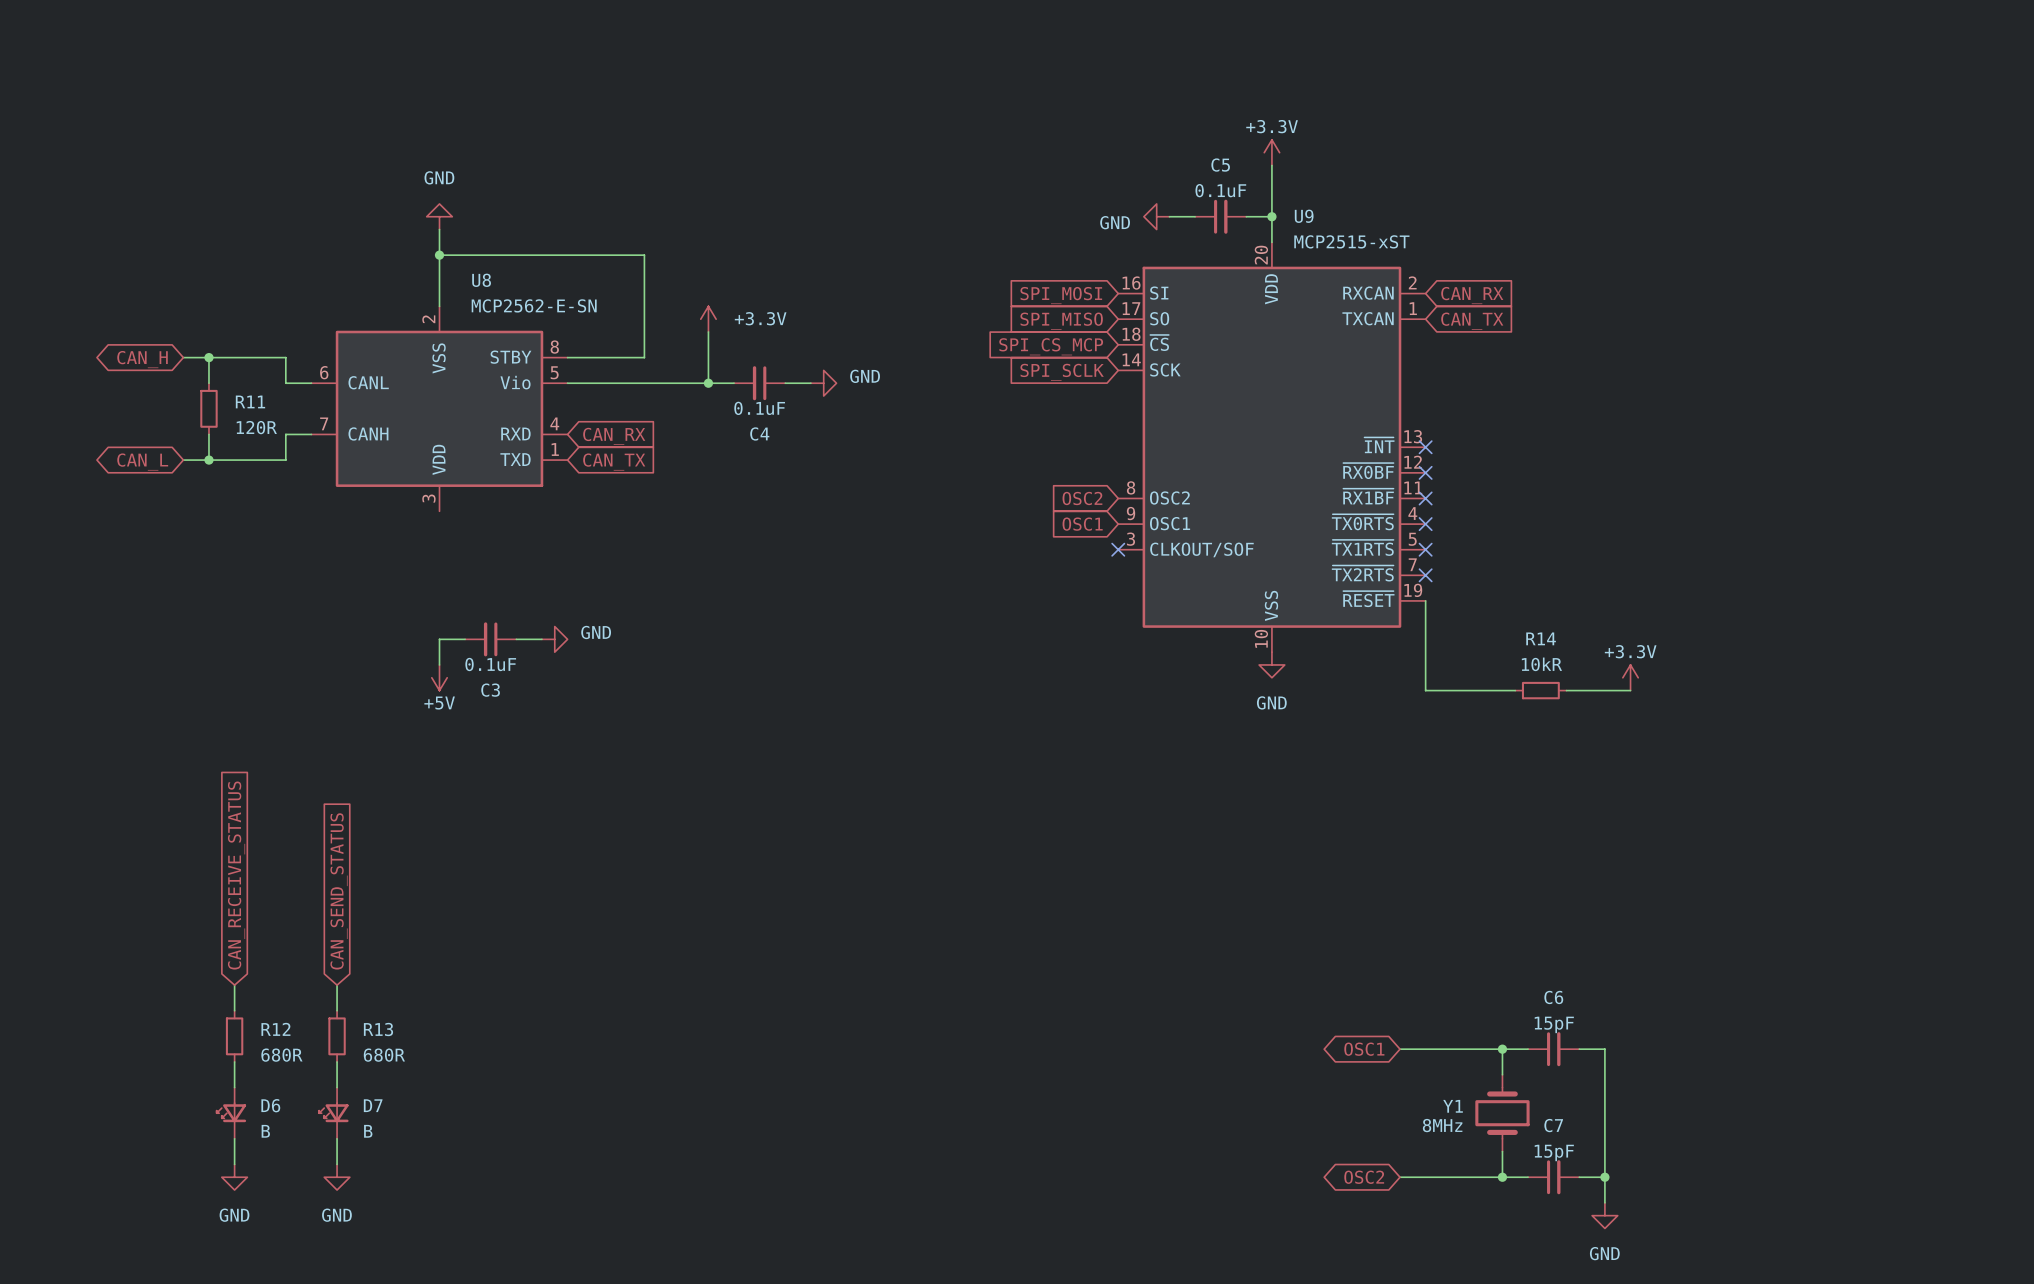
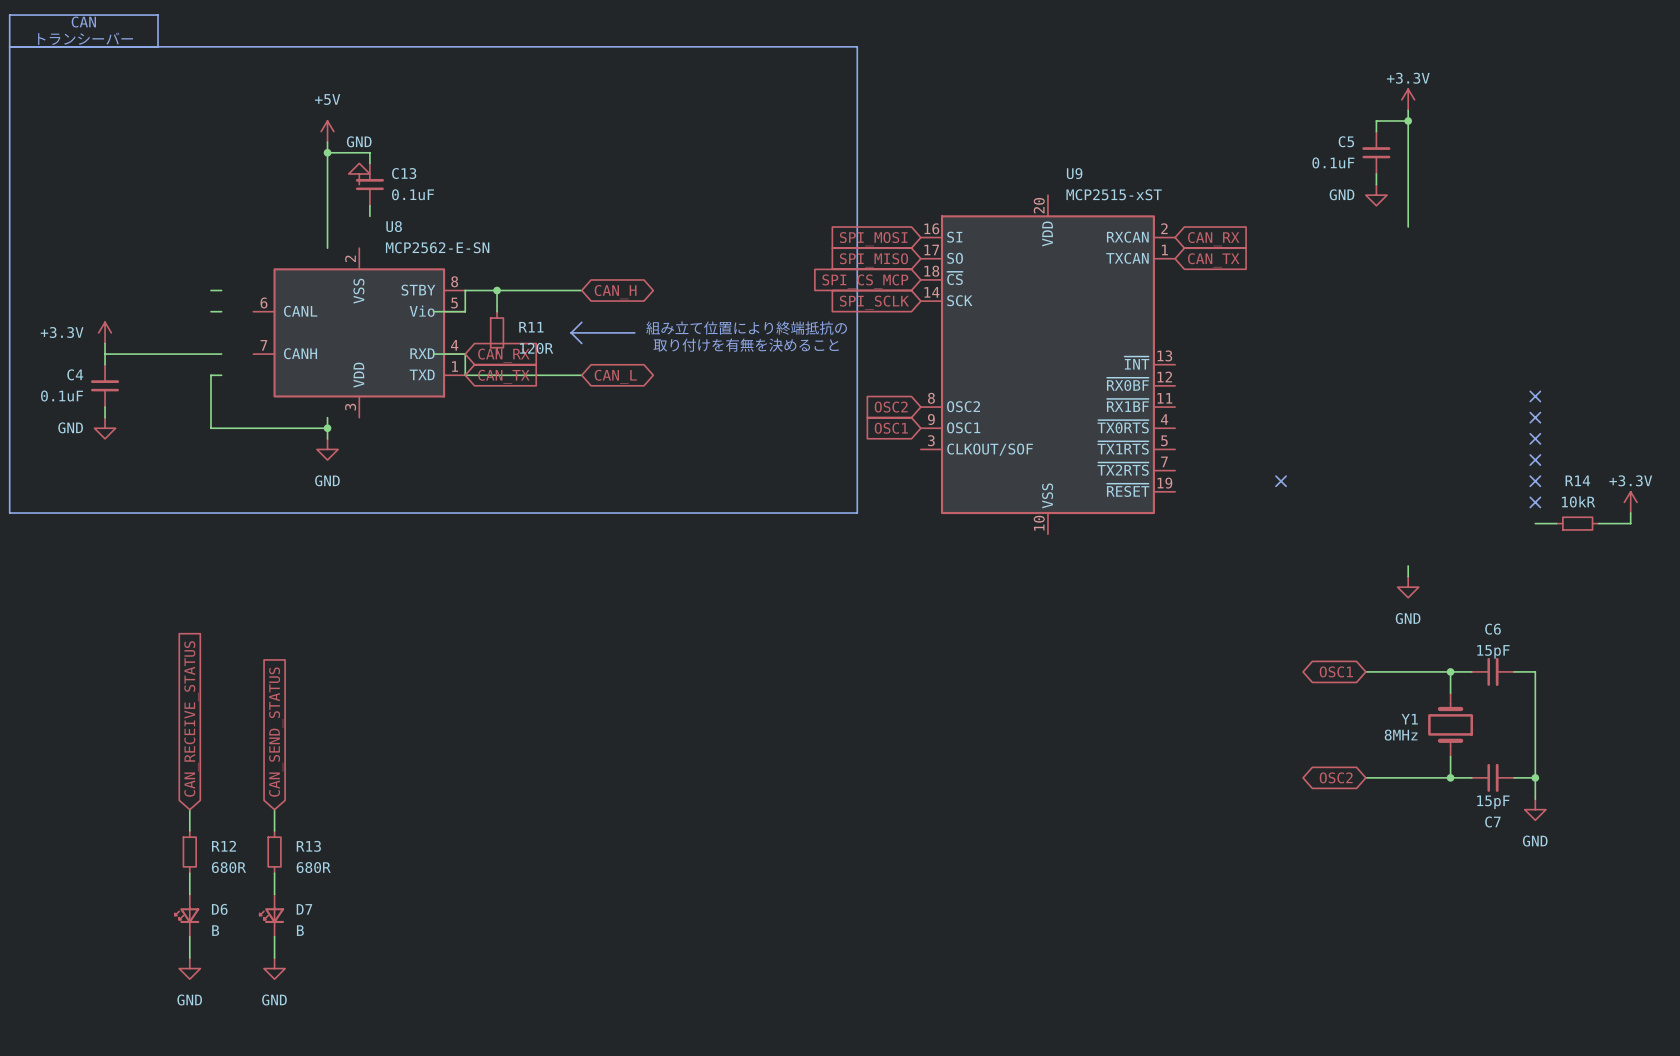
text: none -> CAN (83, 22)
text: none -> トランシーバー (85, 38)
line: none -> (9, 46) (857, 46) (857, 513) (9, 513) (9, 15) (158, 15) (158, 46)
power symbol: none -> +3.3V (1408, 99)
wire: none -> (1408, 110) (1408, 226)
power symbol: +3.3V (1271, 152) -> none
wire: none -> (1408, 121) (1376, 121) (1376, 131)
junction: none -> (1408, 121)
power symbol: none -> +5V (327, 131)
wire: (1271, 165) (1271, 242) -> none
wire: none -> (327, 142) (327, 248)
C5 value position: 0.1uF (1220, 190) -> 0.1uF (1333, 162)
wire: none -> (327, 152) (369, 152) (369, 163)
junction: none -> (327, 152)
power symbol: GND (1156, 216) -> none
wire: (1169, 216) (1195, 216) -> none
C5 rotation: 0° (1220, 216) -> 90° counterclockwise (1376, 152)
C5 position: (1220, 216) -> (1376, 152)
wire: (1246, 216) (1271, 216) -> none
junction: (1271, 216) -> none
wire: none -> (1376, 173) (1376, 184)
wire: (439, 229) (439, 306) -> none
C13: none -> 0.1uF (369, 184)
power symbol: none -> GND (1376, 195)
wire: (439, 255) (644, 255) (644, 357) -> (581, 290) (528, 290)
junction: (439, 255) -> none
wire: none -> (369, 205) (369, 216)
power symbol: +3.3V (708, 319) -> none
wire: (708, 331) (708, 383) -> none
wire: (183, 357) (260, 357) -> none
wire: (208, 357) (208, 383) -> (327, 417) (327, 438)
junction: (208, 357) -> none
wire: (273, 357) (285, 357) (285, 383) (311, 383) -> none
wire: none -> (465, 290) (465, 311) (433, 311)
wire: none -> (497, 290) (497, 311)
junction: none -> (497, 290)
global label: CAN_H (142, 359) -> none
global label: none -> CAN_H (615, 292)
wire: none -> (210, 311) (221, 311)
wire: (567, 383) (734, 383) -> none
junction: (708, 383) -> none
C4 rotation: 0° (759, 383) -> 90° clockwise (105, 385)
C4 position: (759, 383) -> (105, 385)
wire: (785, 383) (810, 383) -> none
power symbol: GND (823, 383) -> none
line: none -> (581, 322) (571, 332)
text: none -> 組み立て位置により終端抵抗の (746, 328)
power symbol: none -> +3.3V (105, 332)
R11 position: (208, 408) -> (497, 332)
line: none -> (571, 332) (634, 332)
line: none -> (571, 332) (581, 343)
C4 value position: 0.1uF (759, 408) -> 0.1uF (62, 396)
text: none -> 取り付けを有無を決めること (746, 345)
wire: none -> (105, 354) (221, 354)
wire: (208, 434) (208, 460) -> (105, 343) (105, 364)
wire: (311, 434) (285, 434) (285, 460) (273, 460) -> none
wire: none -> (433, 354) (465, 354) (465, 375) (581, 375)
no-connect mark: (1425, 447) -> none
wire: (183, 460) (260, 460) -> (327, 428) (210, 428) (210, 375)
junction: (208, 460) -> none
global label: CAN_L (142, 462) -> none
global label: none -> CAN_L (615, 376)
no-connect mark: (1425, 472) -> none
no-connect mark: none -> (1535, 396)
wire: none -> (105, 407) (105, 417)
no-connect mark: (1425, 498) -> none
no-connect mark: none -> (1535, 417)
power symbol: none -> GND (105, 428)
junction: none -> (327, 428)
no-connect mark: (1425, 524) -> none
no-connect mark: none -> (1535, 438)
no-connect mark: (1118, 549) -> none
no-connect mark: (1425, 549) -> none
no-connect mark: none -> (1535, 460)
no-connect mark: (1425, 575) -> none
no-connect mark: none -> (1281, 481)
no-connect mark: none -> (1535, 481)
wire: (1425, 600) (1425, 690) (1515, 690) -> none
no-connect mark: none -> (1535, 502)
power symbol: none -> +3.3V (1630, 502)
wire: none -> (1630, 513) (1630, 523) (1598, 523)
wire: (465, 639) (439, 639) (439, 664) -> none
C3: 0.1uF (490, 639) -> none
wire: (516, 639) (541, 639) -> none
power symbol rotation: 0° (554, 639) -> 90° clockwise (327, 449)
power symbol position: GND (554, 639) -> GND (327, 449)
wire: none -> (1535, 523) (1556, 523)
power symbol: GND (1271, 664) -> none
power symbol: +5V (439, 677) -> none
power symbol: +3.3V (1630, 677) -> none
R14 position: (1540, 690) -> (1577, 523)
wire: (1566, 690) (1630, 690) -> none
wire: none -> (1408, 565) (1408, 576)
power symbol: none -> GND (1408, 587)
global label: none -> OSC1 (1336, 671)
wire: none -> (1365, 671) (1471, 671)
wire: none -> (1450, 671) (1450, 693)
junction: none -> (1450, 671)
wire: none -> (1514, 671) (1535, 671) (1535, 799)
wire: none -> (1450, 756) (1450, 777)
global label: none -> OSC2 (1336, 777)
wire: none -> (1365, 777) (1471, 777)
junction: none -> (1450, 777)
wire: none -> (1514, 777) (1535, 777)
junction: none -> (1535, 777)
power symbol: none -> GND (1535, 809)
global label: OSC1 (1364, 1049) -> none
wire: (1400, 1049) (1528, 1049) -> none
wire: (1502, 1049) (1502, 1074) -> none
junction: (1502, 1049) -> none
C6 position: (1553, 1049) -> (1492, 671)
wire: (1579, 1049) (1604, 1049) (1604, 1202) -> none
Y1 position: (1502, 1113) -> (1450, 724)
C7 name position: C7 (1553, 1125) -> C7 (1492, 821)
wire: (1502, 1151) (1502, 1177) -> none
C7 value position: 15pF (1554, 1152) -> 15pF (1493, 802)
global label: OSC2 (1364, 1177) -> none
wire: (1400, 1177) (1528, 1177) -> none
junction: (1502, 1177) -> none
C7 position: (1553, 1177) -> (1492, 777)
wire: (1579, 1177) (1604, 1177) -> none
junction: (1604, 1177) -> none
power symbol: GND (1604, 1215) -> none

